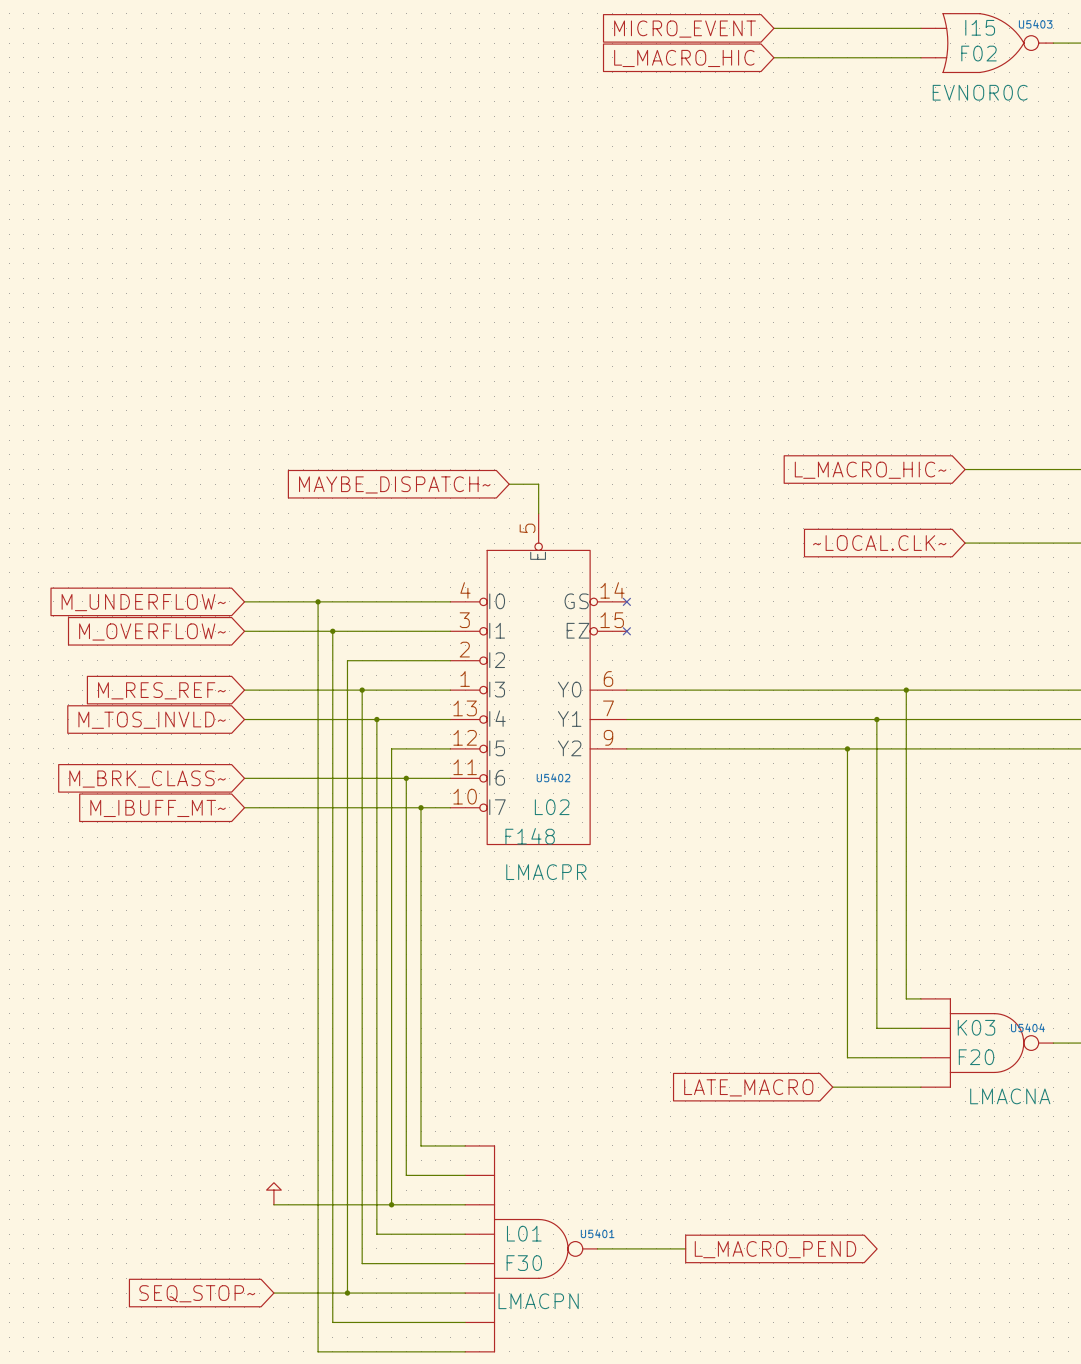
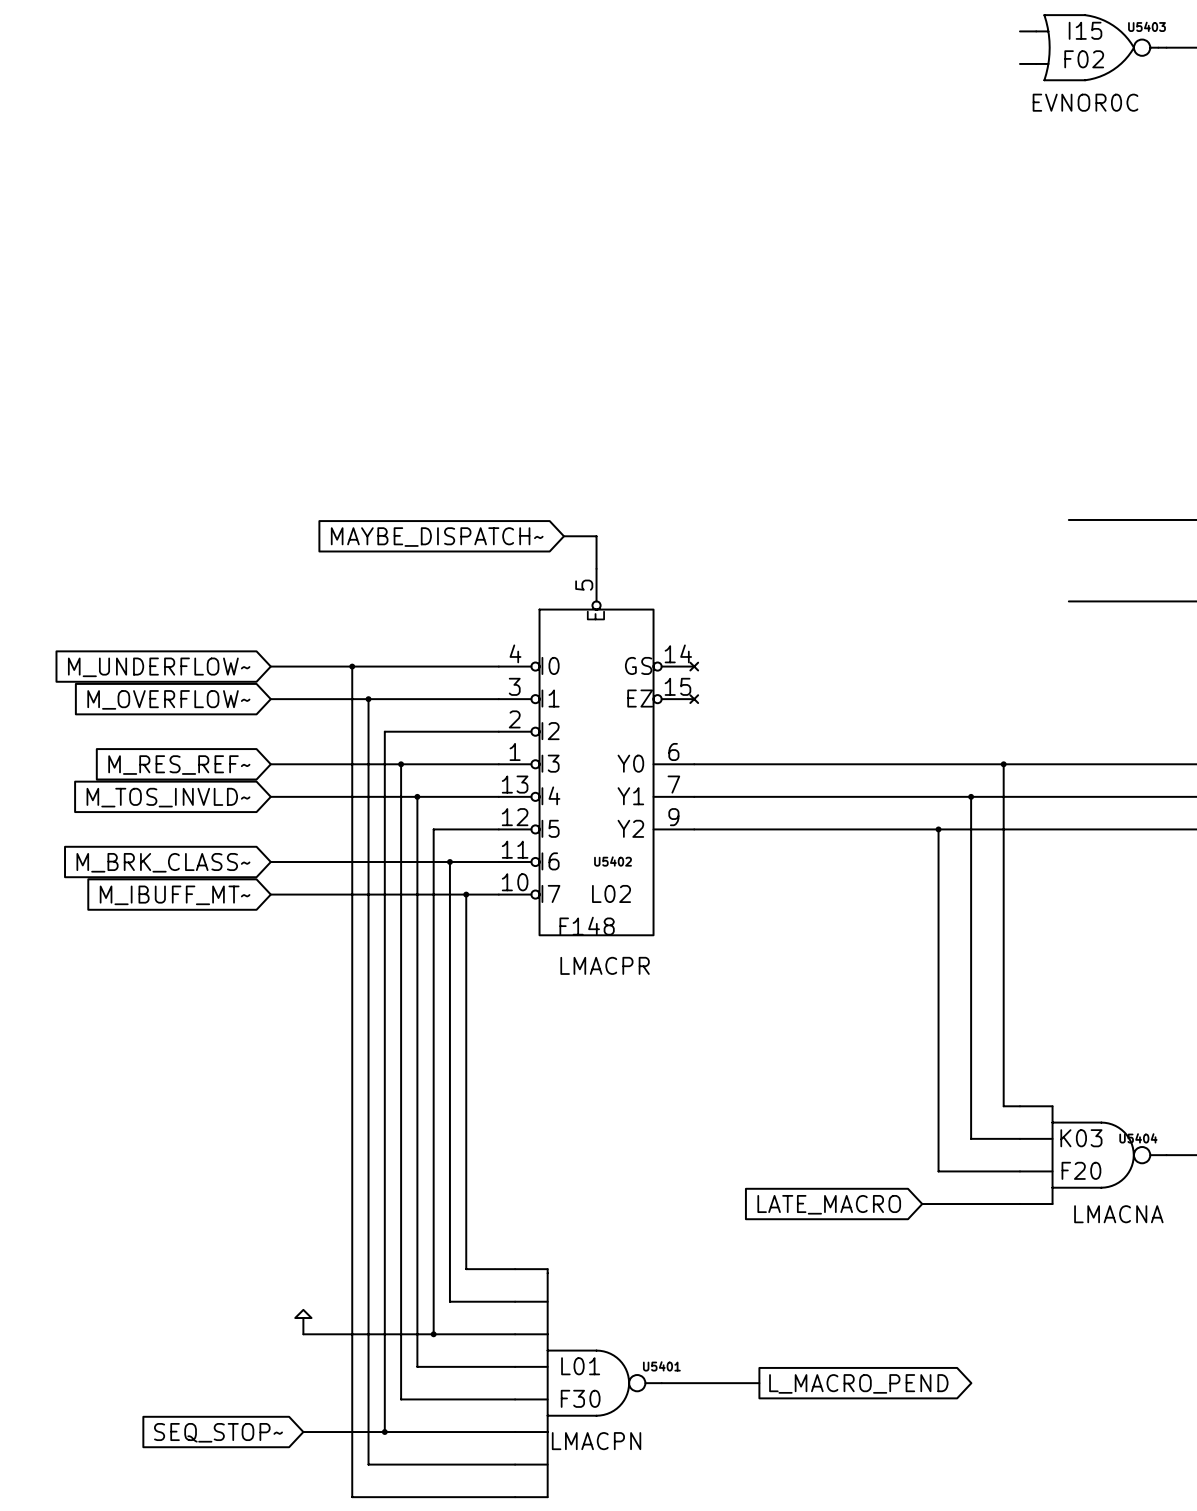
wire: (773, 28) (920, 28) -> none
global label: MICRO_EVENT (685, 29) -> none
wire: (773, 57) (920, 57) -> none
global label: L_MACRO_HIC (684, 58) -> none
global label: L_MACRO_HIC~ (870, 470) -> none
global label: ~LOCAL.CLK~ (879, 543) -> none

